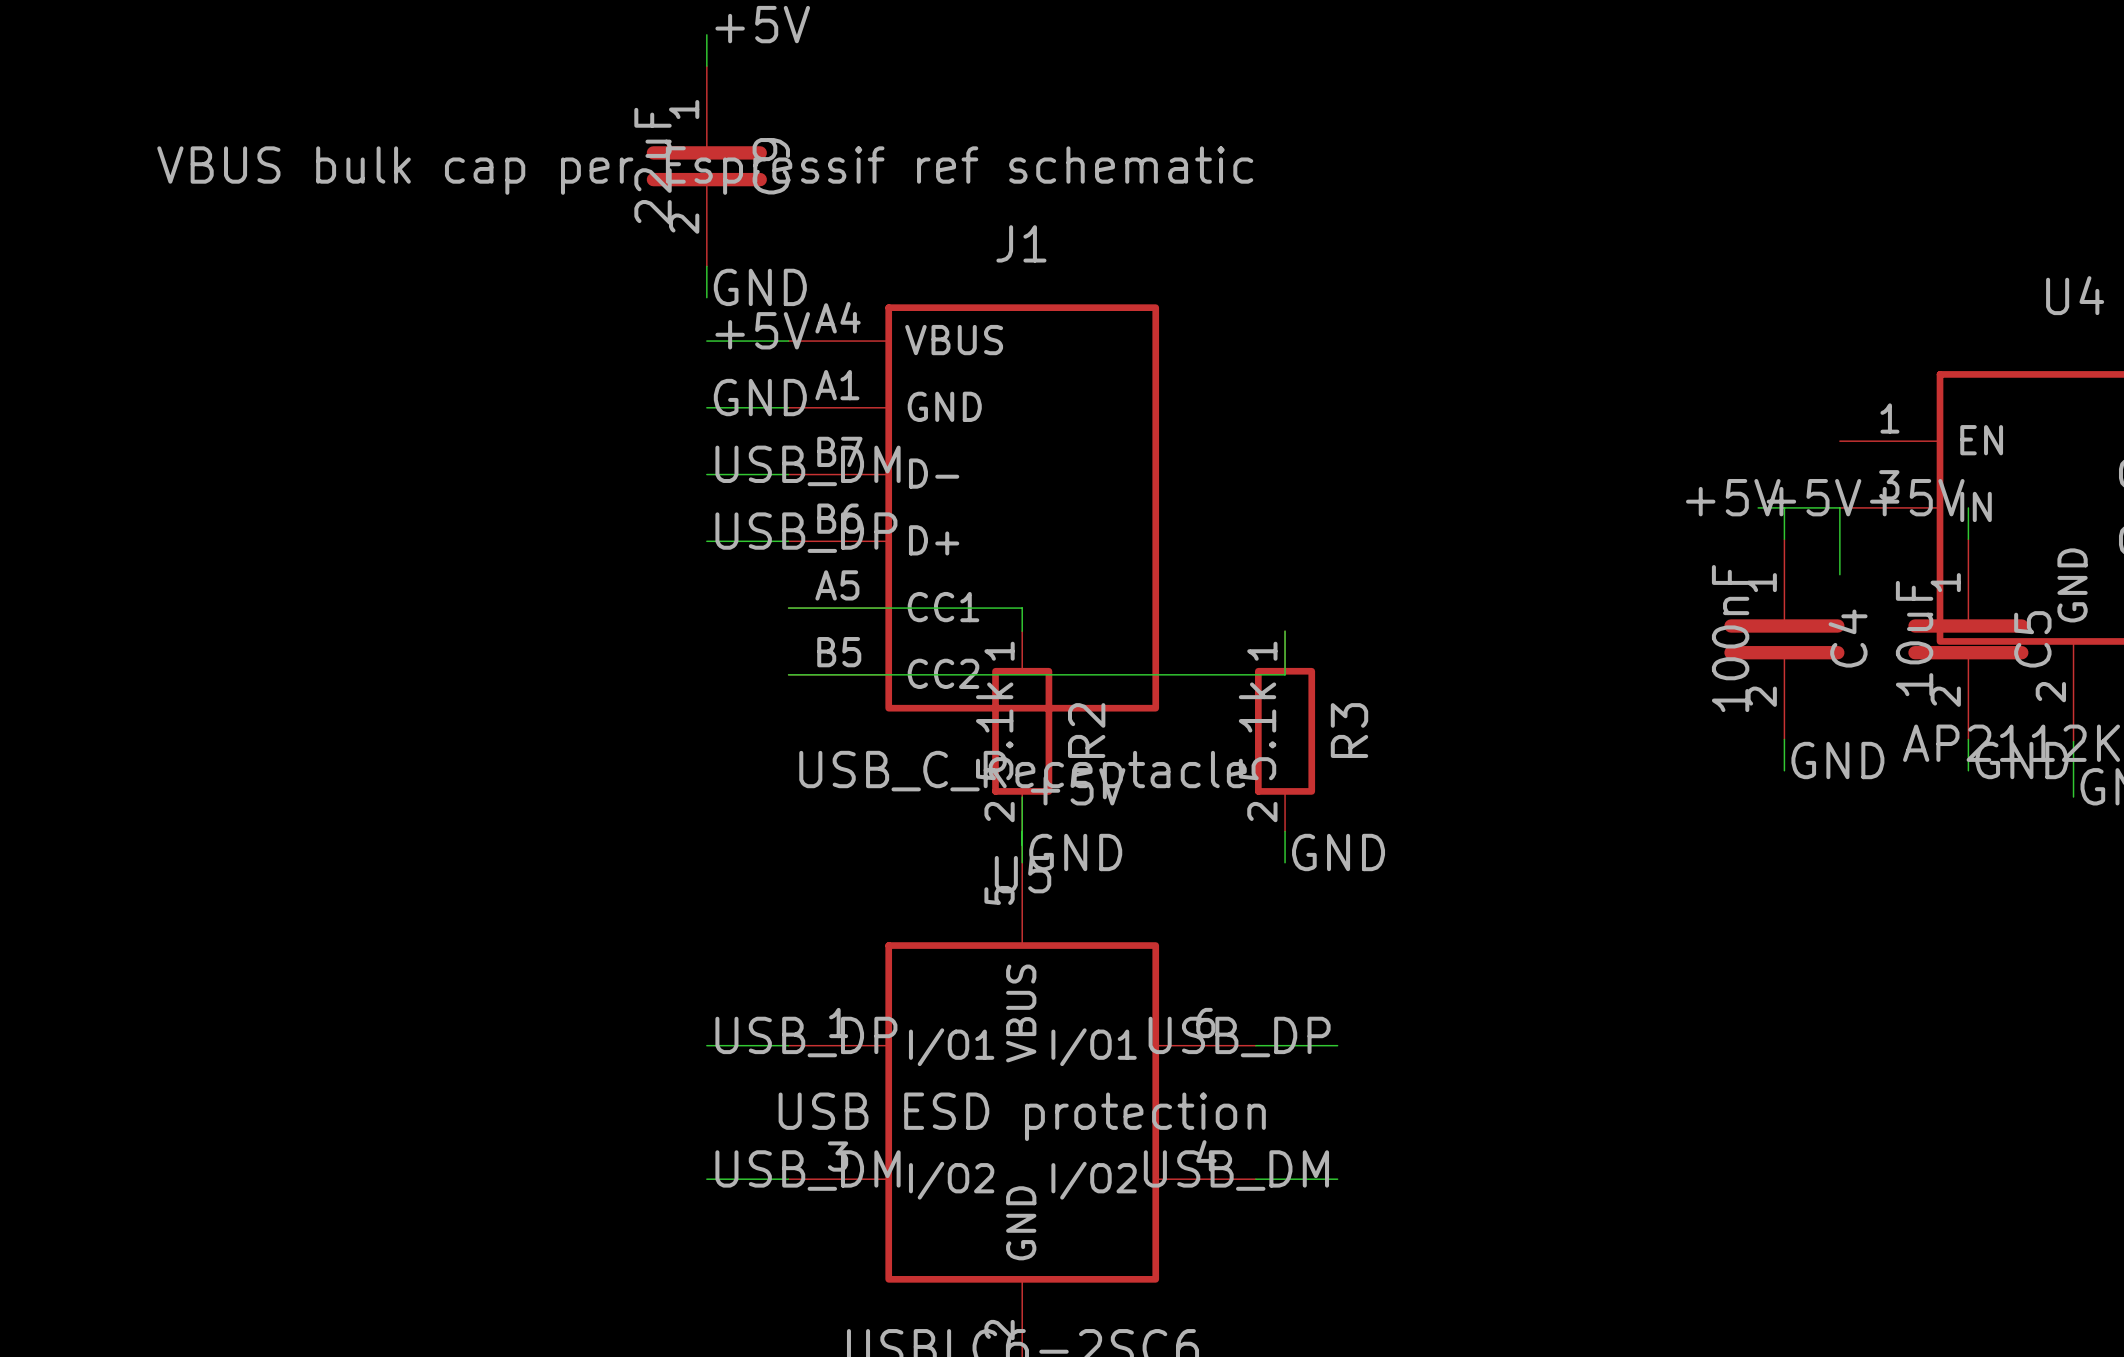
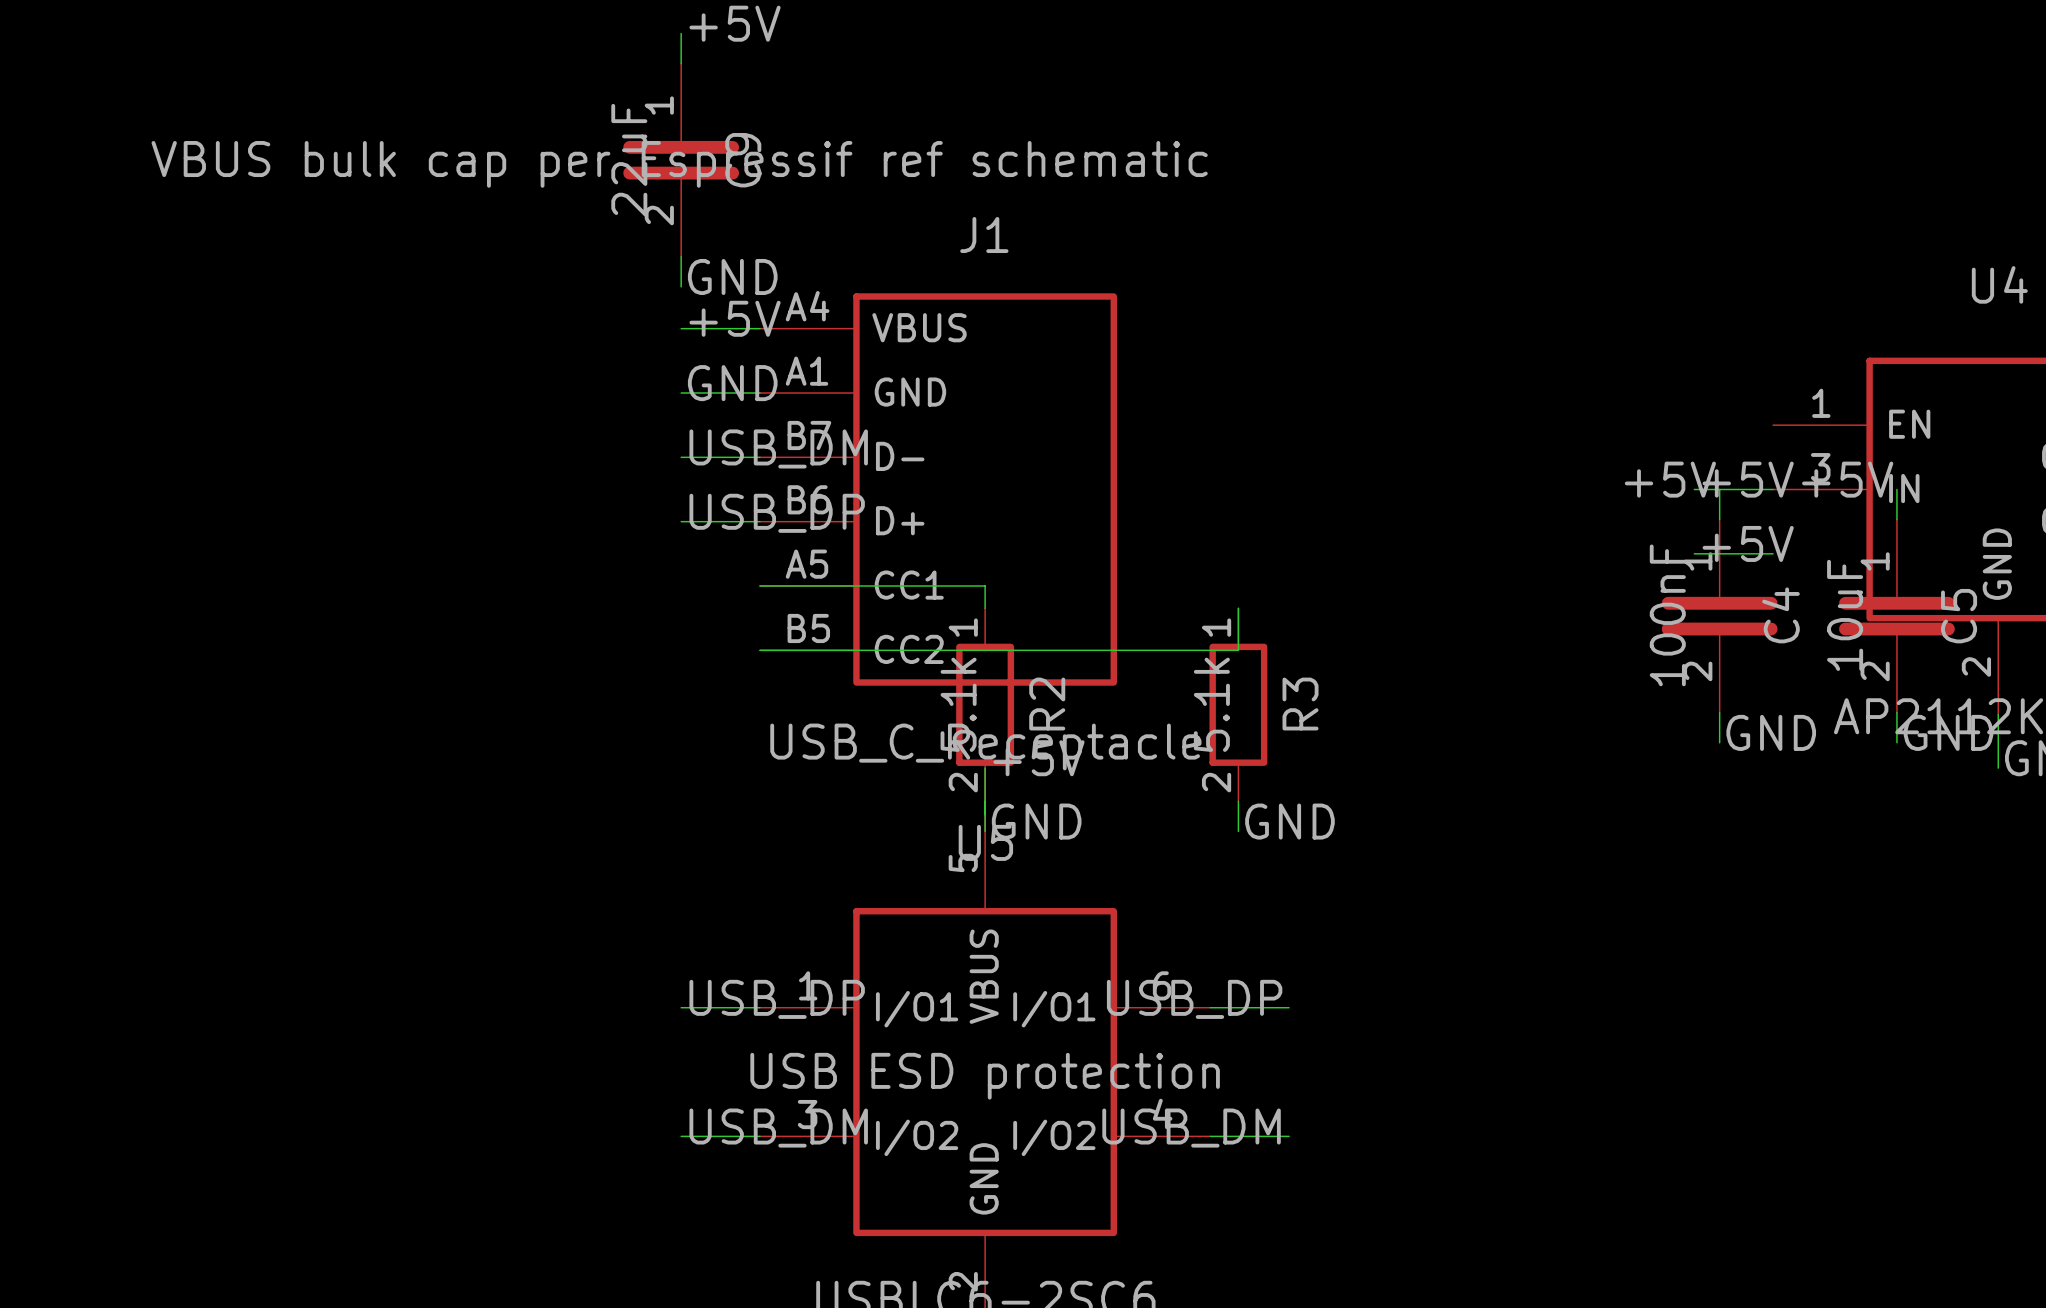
wire: (1839, 507) (1839, 574) -> (1694, 553) (1773, 553)
label: none -> +5V (1748, 543)

